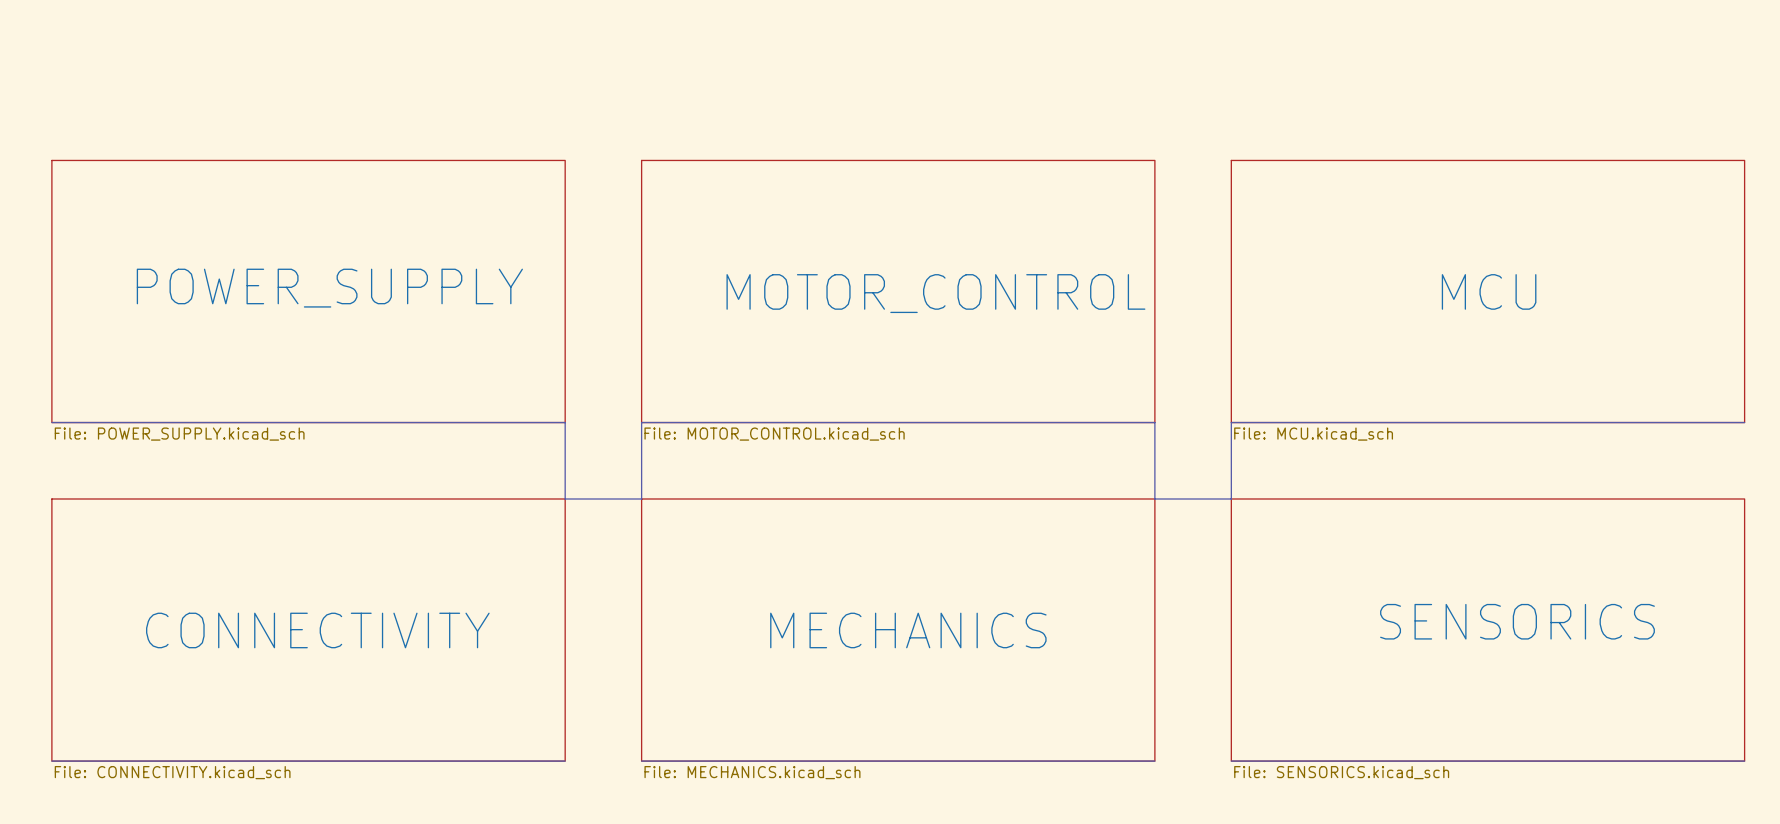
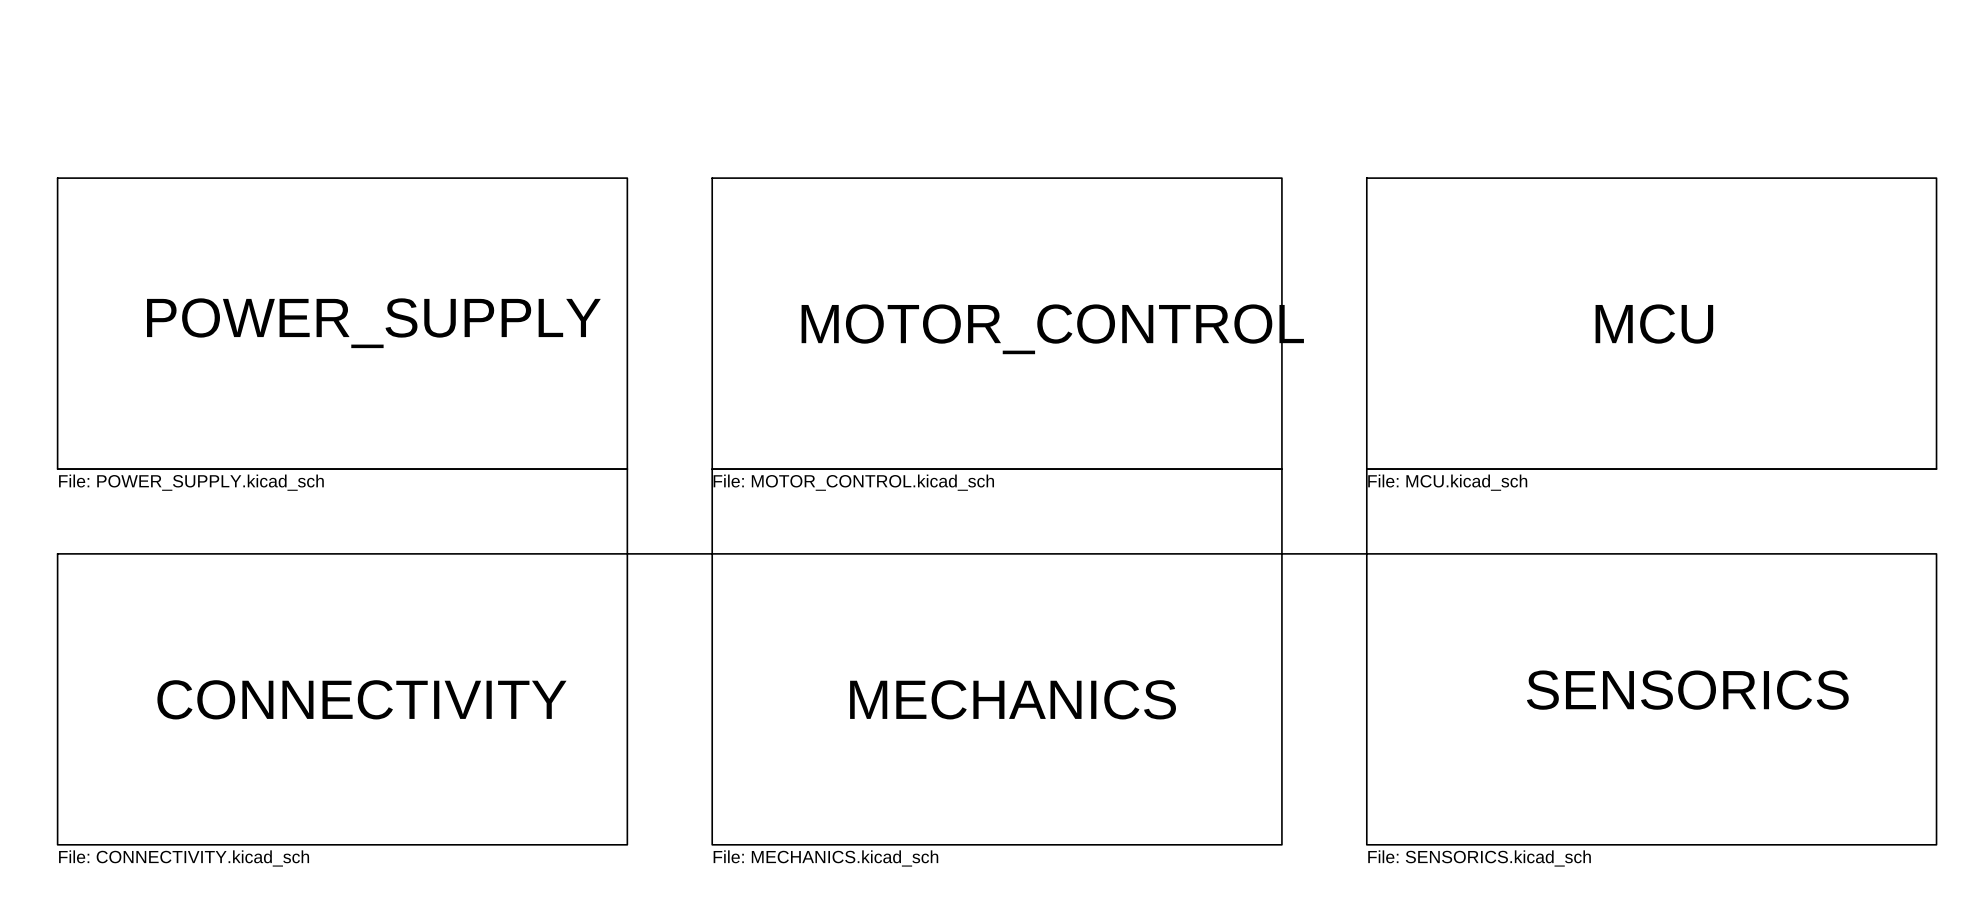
bus: (51, 761) (565, 761) -> none
bus: (641, 761) (1154, 761) -> none
bus: (1231, 761) (1744, 761) -> none

